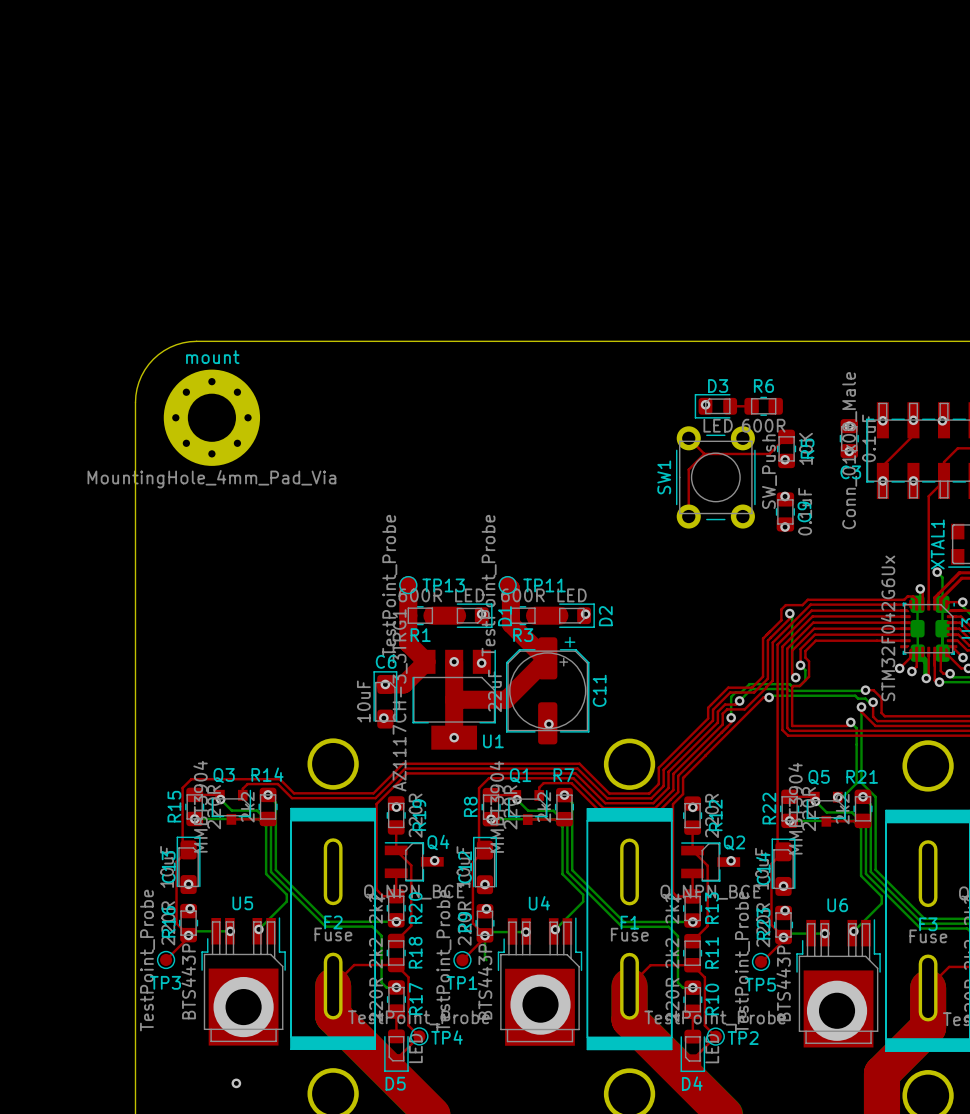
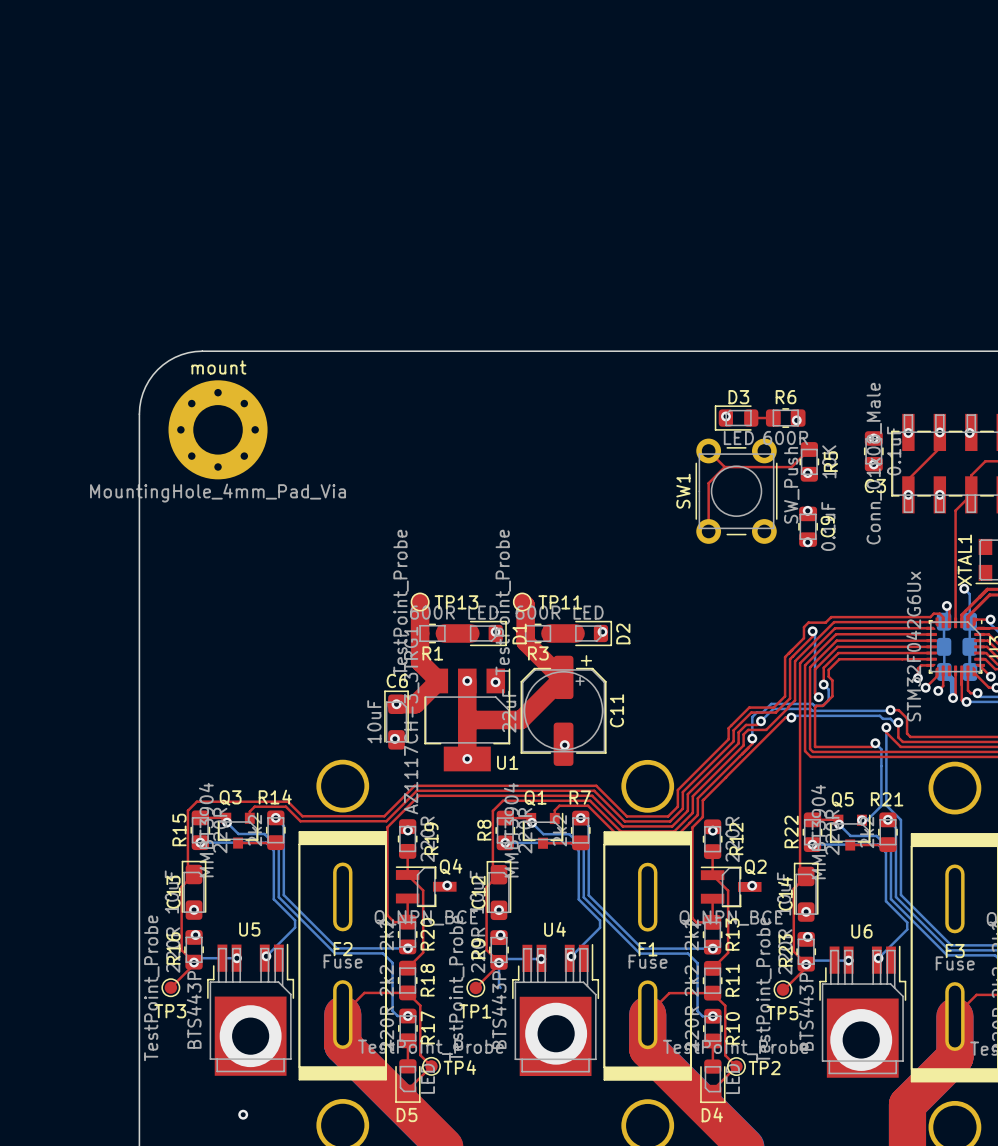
via: none -> (796, 420)
top track: none -> (930, 665) (921, 665) (917, 668) (917, 678)
via: none -> (917, 678)

